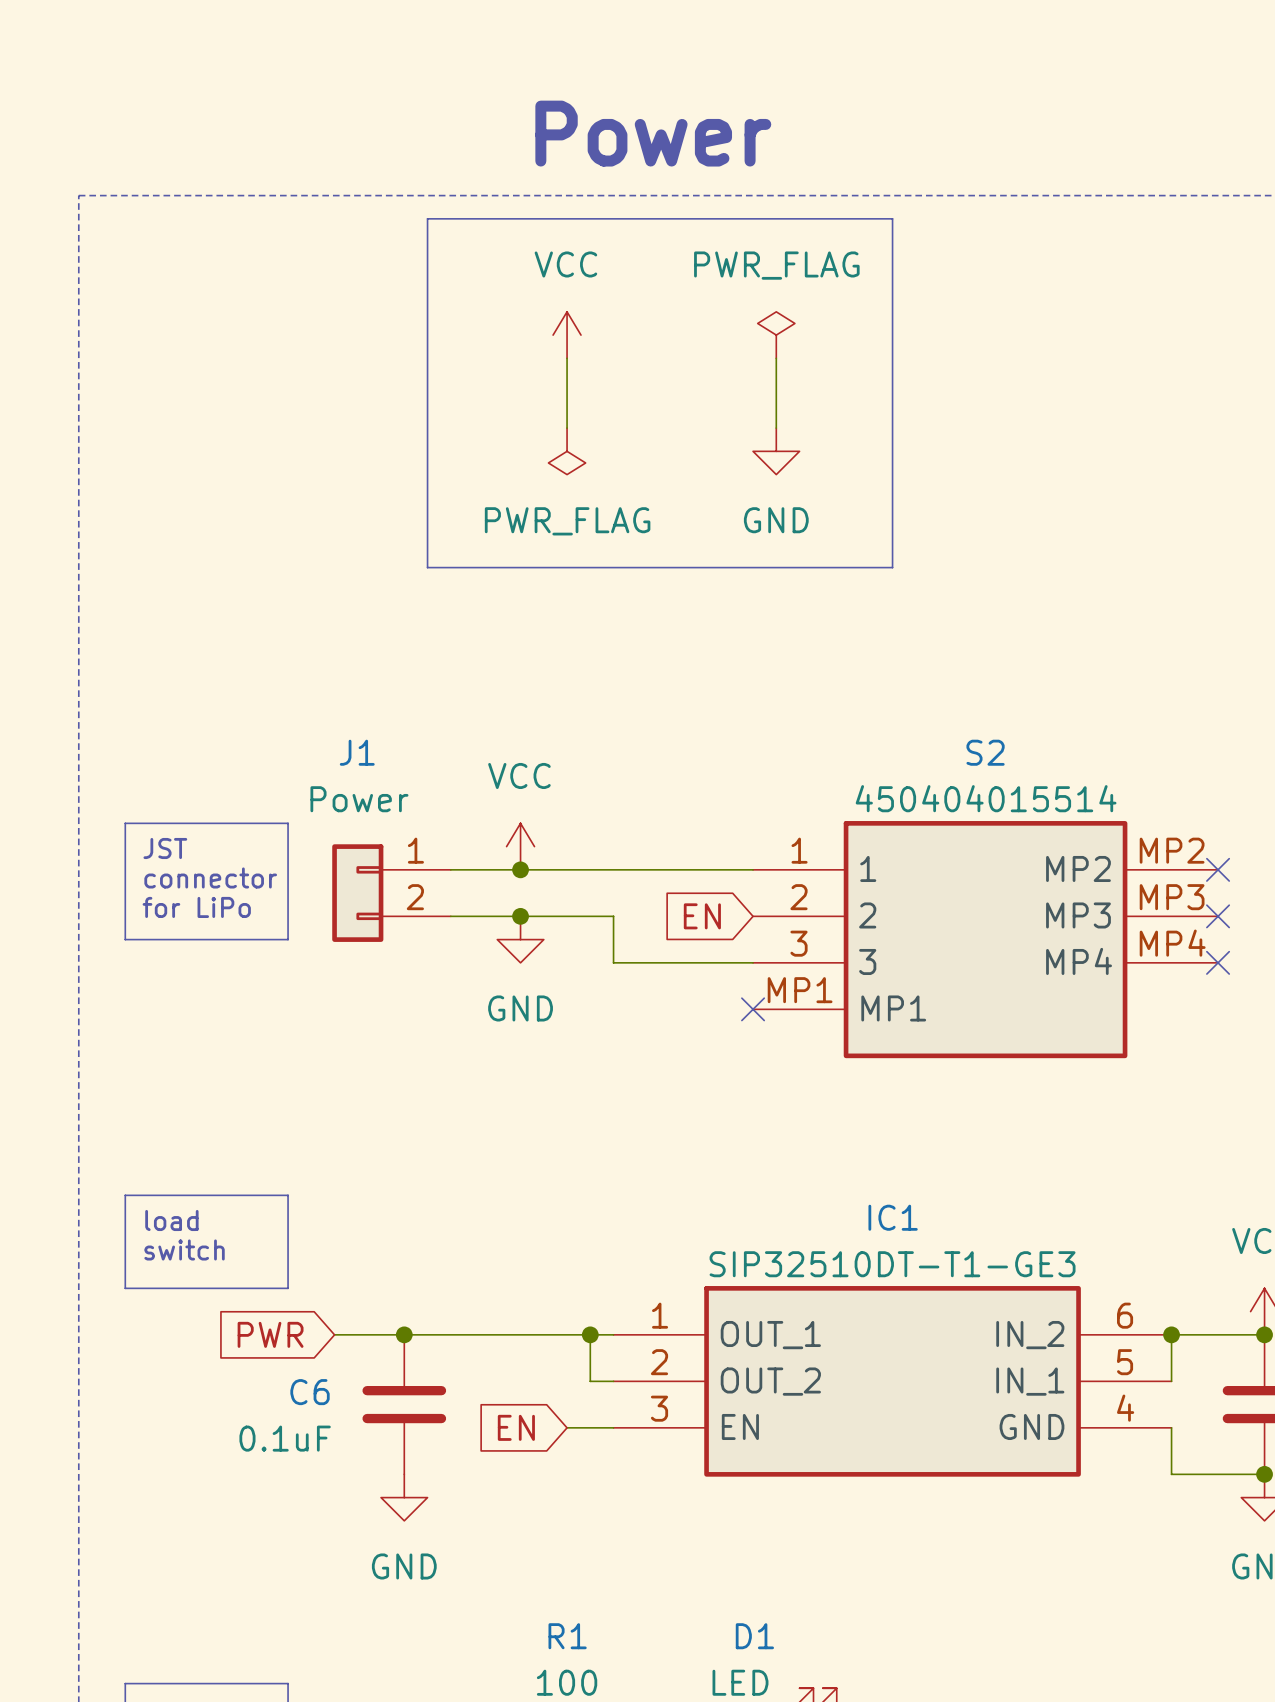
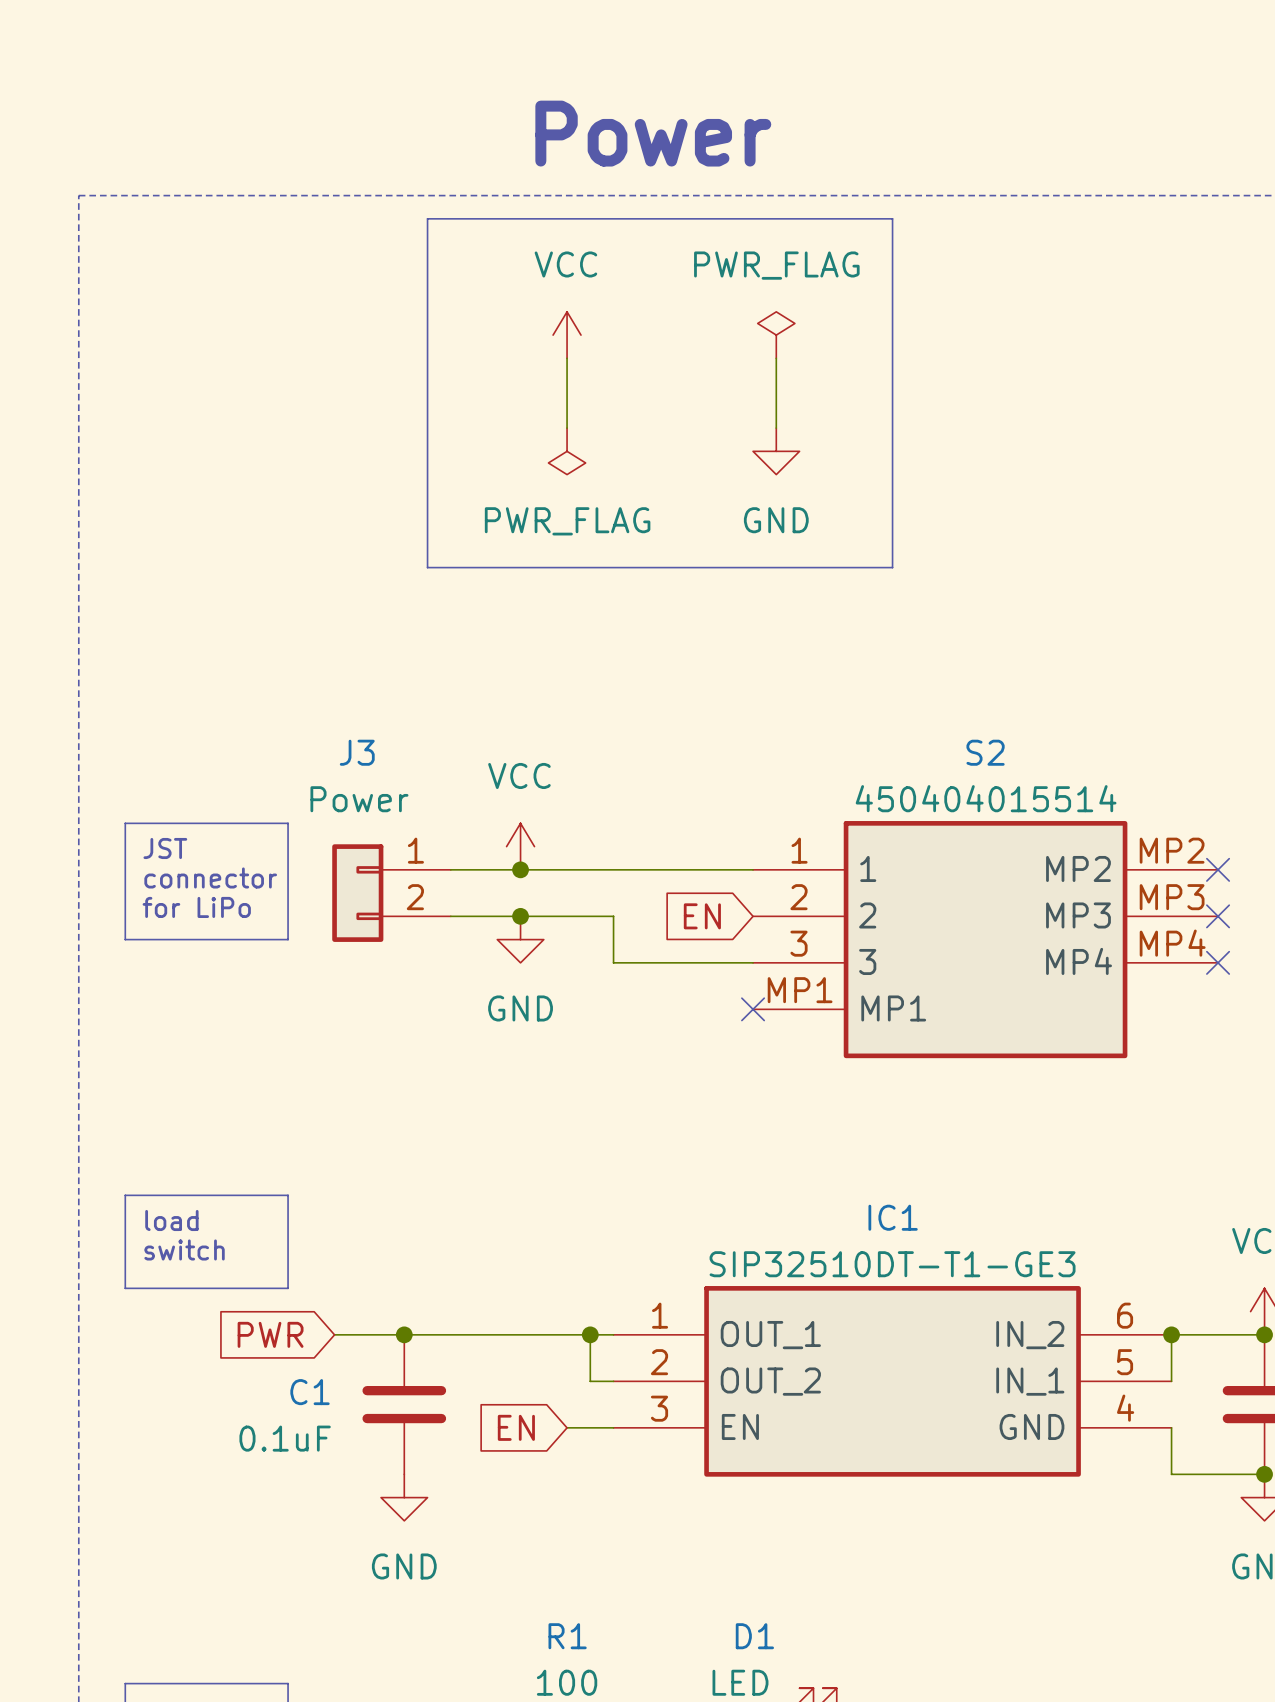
J1 name: J1 (357, 752) -> J3 (357, 752)
C6 name: C6 (310, 1392) -> C1 (310, 1392)

